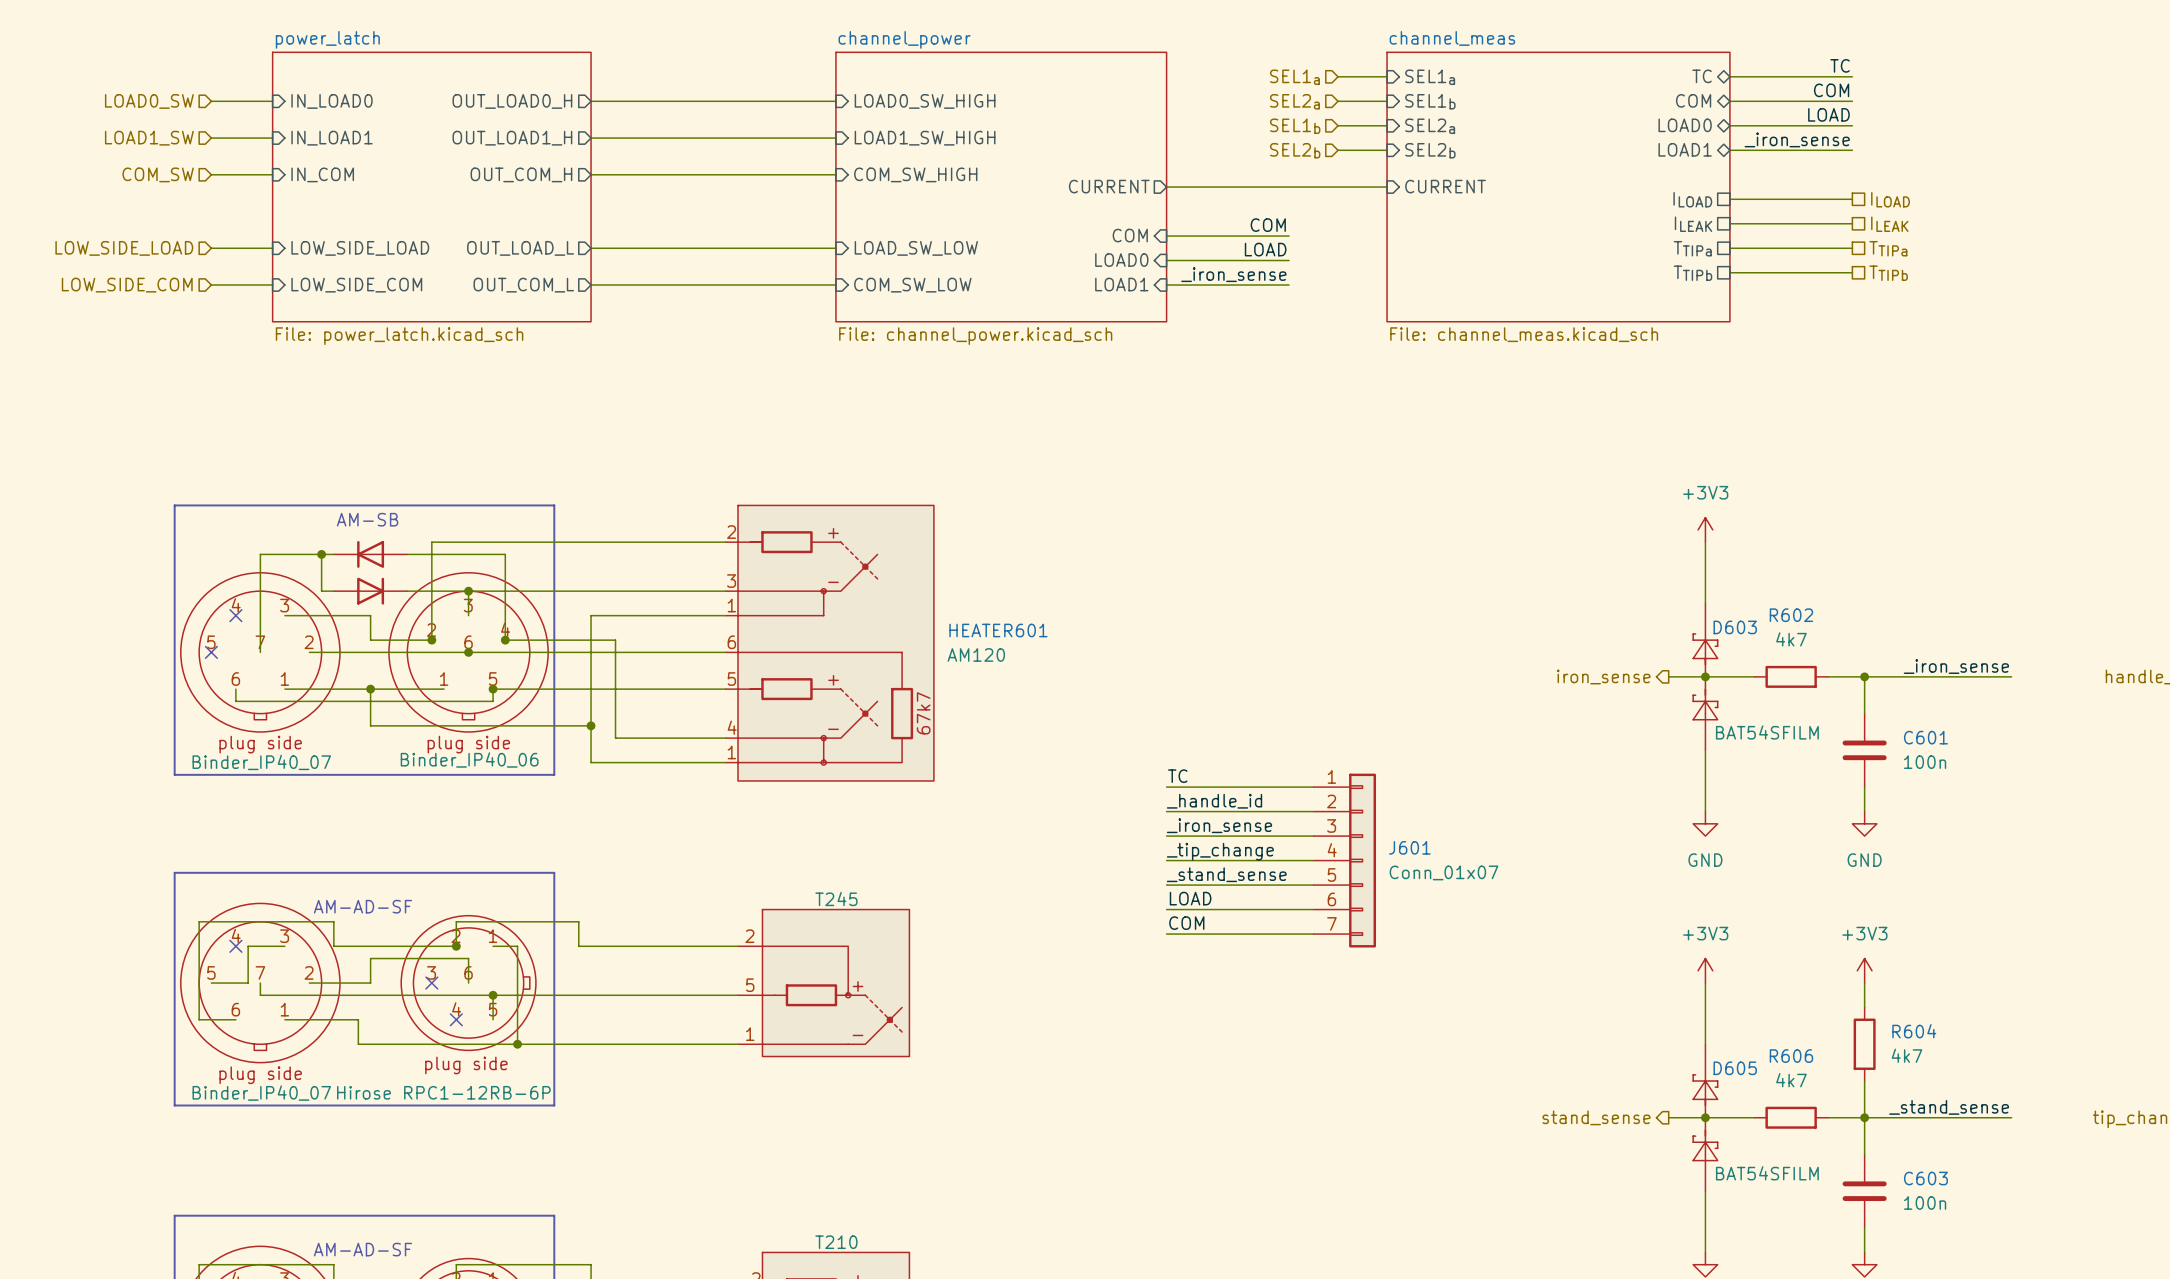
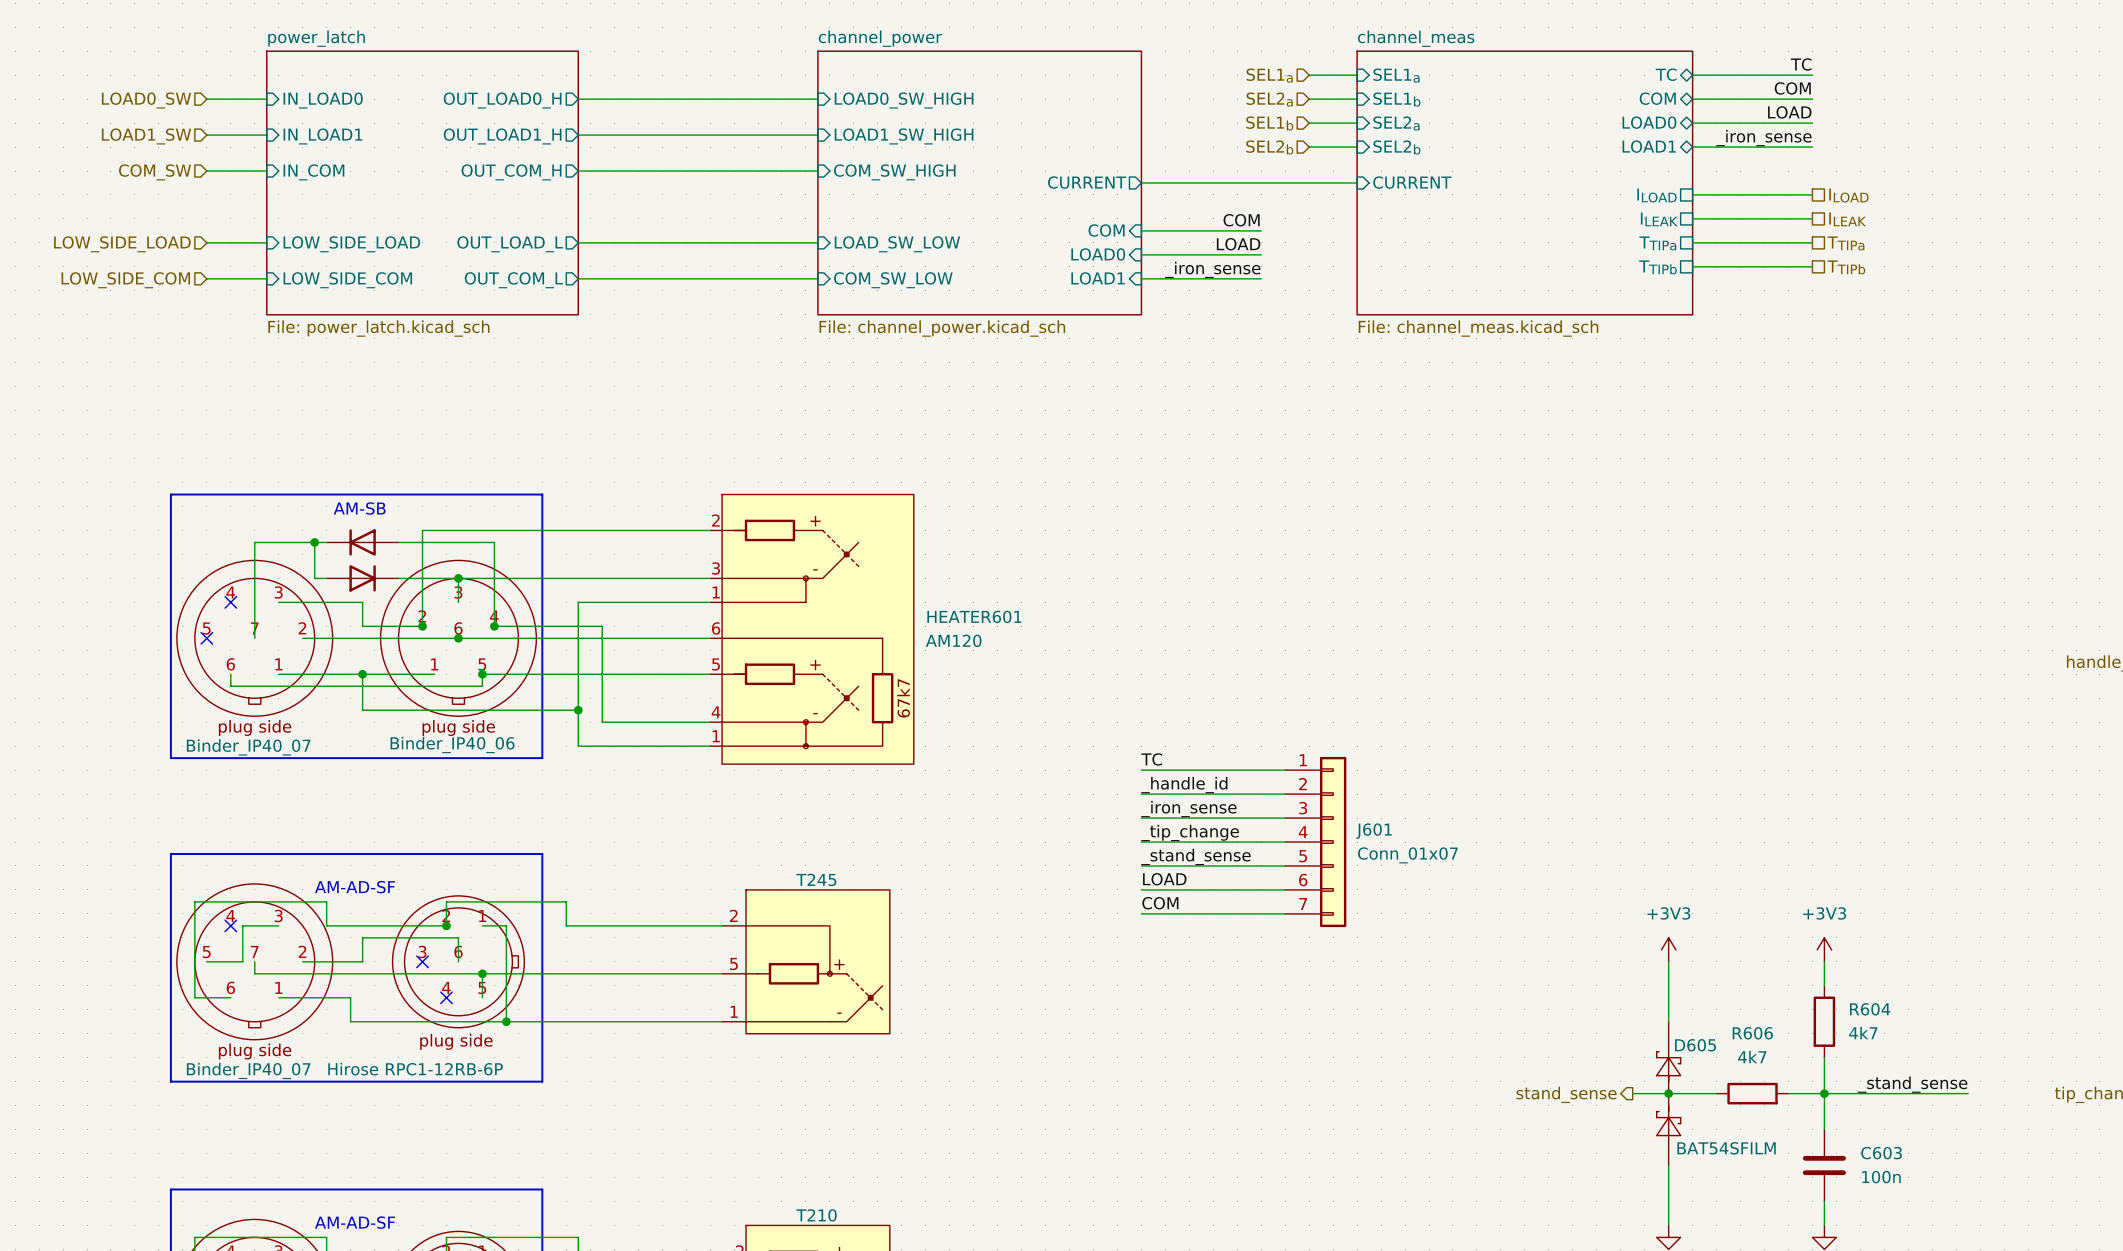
power symbol: +3V3 (1705, 529) -> none
wire: (1705, 542) (1705, 603) -> none
label: _iron_sense (1956, 666) -> none
wire: (1668, 676) (1754, 676) -> none
junction: (1705, 676) -> none
D603: BAT54SFILM (1705, 676) -> none
R602: 4k7 (1791, 676) -> none
wire: (1827, 676) (2011, 676) -> none
wire: (1864, 676) (1864, 713) -> none
junction: (1864, 676) -> none
hierarchical label: iron_sense (1603, 677) -> none
wire: (1705, 750) (1705, 811) -> none
C601: 100n (1864, 750) -> none
wire: (1864, 787) (1864, 811) -> none
power symbol: GND (1705, 823) -> none
power symbol: GND (1864, 823) -> none

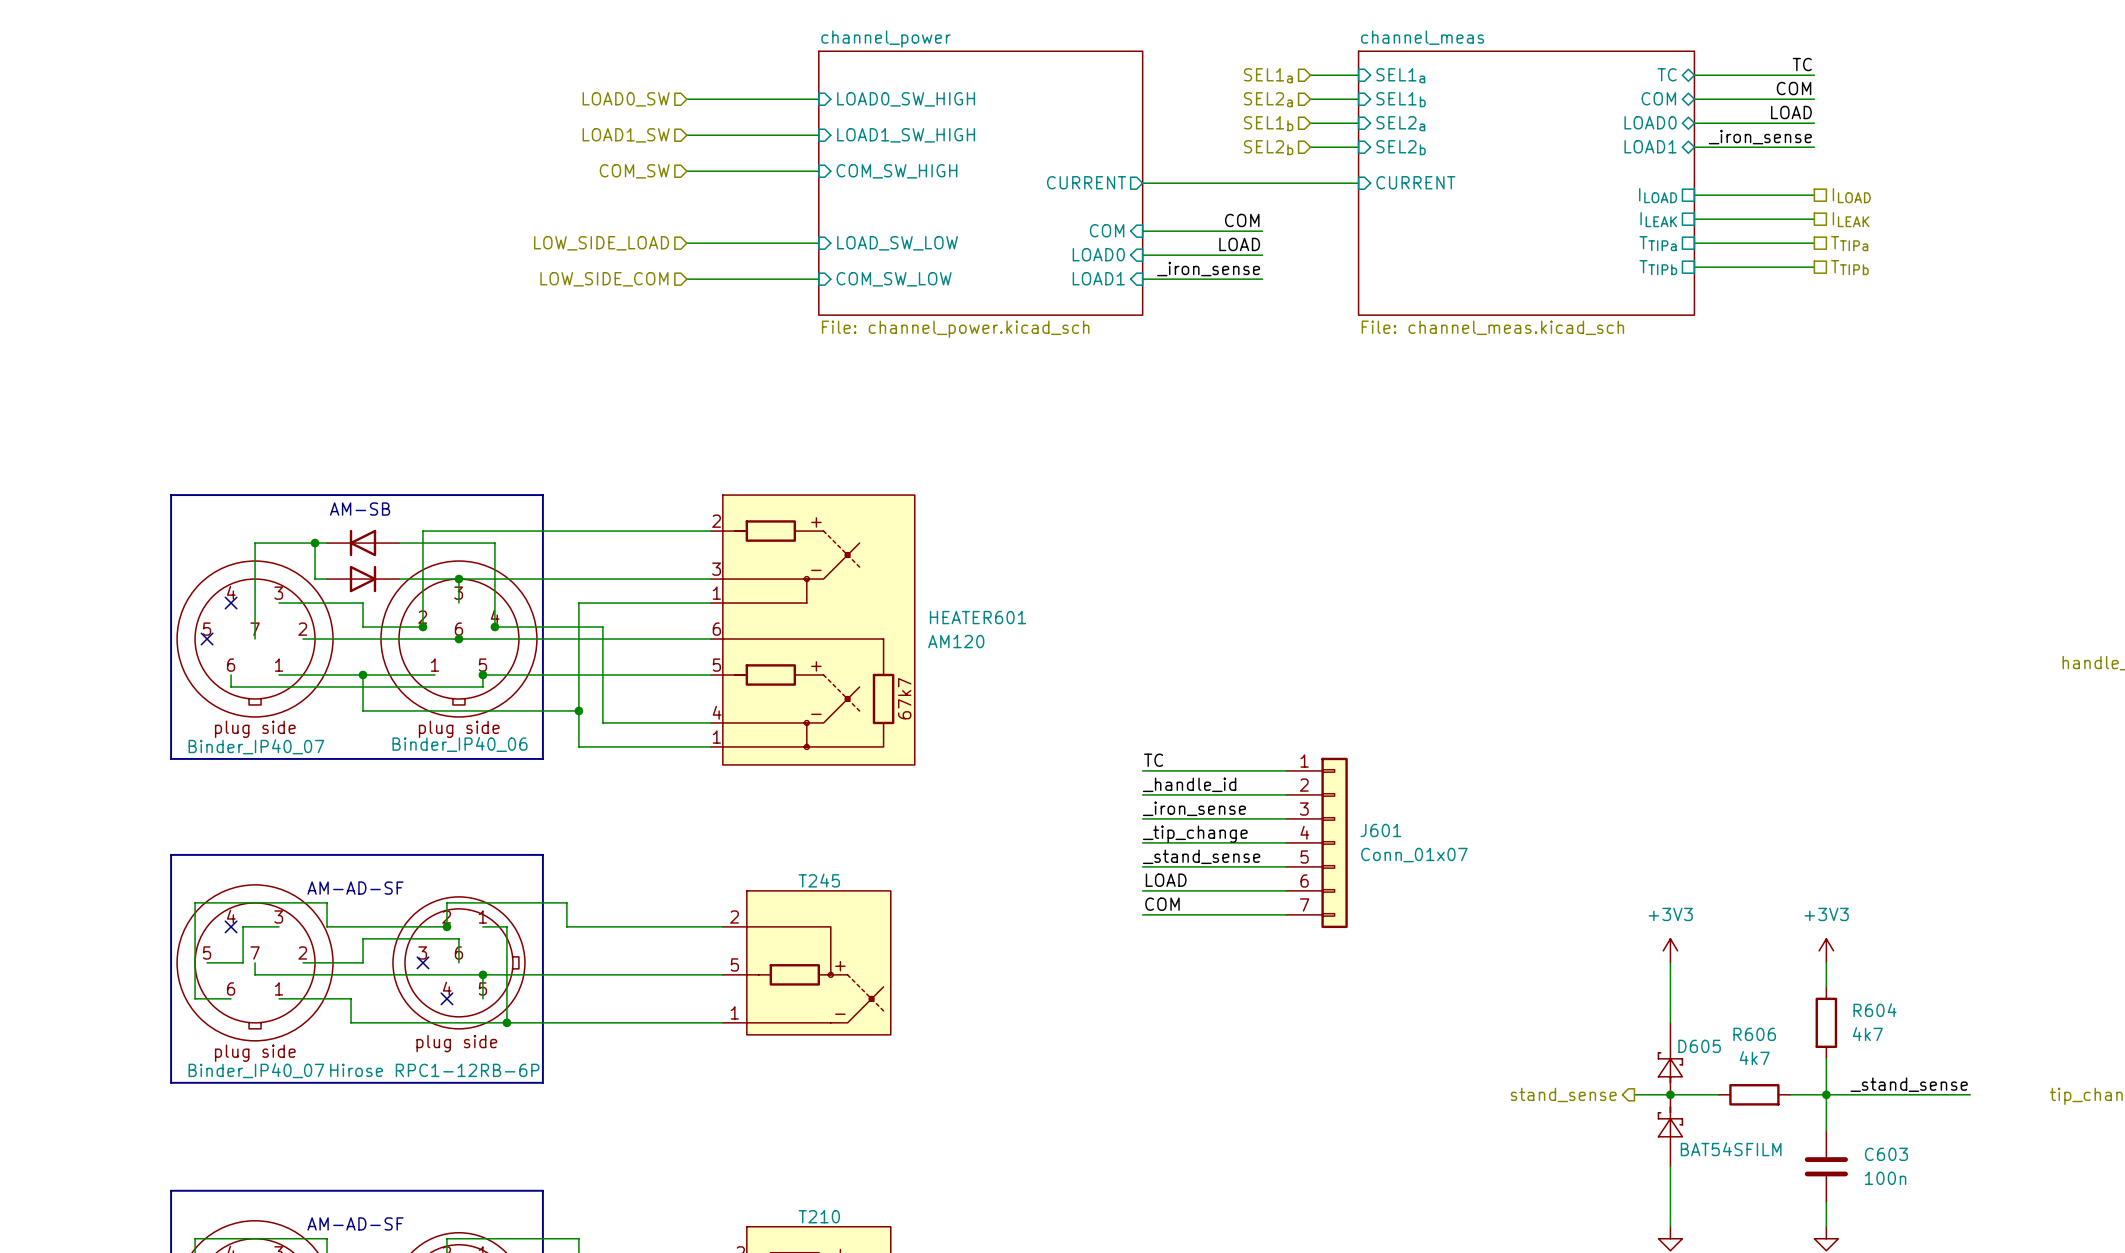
wire: (206, 99) (266, 99) -> none
wire: (578, 99) (686, 99) -> none
hierarchical label: LOAD0_SW (146, 100) -> none
sheet pin: IN_LOAD0 (323, 100) -> none
sheet pin: OUT_LOAD0_H (502, 100) -> none
hierarchical label: none -> LOAD0_SW (626, 99)
wire: (206, 135) (266, 135) -> none
wire: (578, 135) (686, 135) -> none
hierarchical label: LOAD1_SW (146, 136) -> none
sheet pin: IN_LOAD1 (322, 136) -> none
sheet pin: OUT_LOAD1_H (502, 136) -> none
hierarchical label: none -> LOAD1_SW (626, 135)
wire: (206, 171) (266, 171) -> none
wire: (578, 171) (686, 171) -> none
hierarchical label: COM_SW (155, 172) -> none
sheet pin: IN_COM (313, 172) -> none
sheet pin: OUT_COM_H (511, 172) -> none
hierarchical label: none -> COM_SW (634, 171)
sheet power_latch: File: power_latch.kicad_sch (422, 183) -> none
wire: (206, 242) (266, 242) -> none
wire: (578, 242) (686, 242) -> none
hierarchical label: LOW_SIDE_LOAD (122, 244) -> none
sheet pin: LOW_SIDE_LOAD (351, 244) -> none
sheet pin: OUT_LOAD_L (510, 244) -> none
hierarchical label: none -> LOW_SIDE_LOAD (601, 243)
wire: (206, 278) (266, 278) -> none
wire: (578, 278) (686, 278) -> none
hierarchical label: LOW_SIDE_COM (125, 280) -> none
sheet pin: LOW_SIDE_COM (347, 280) -> none
sheet pin: OUT_COM_L (513, 280) -> none
hierarchical label: none -> LOW_SIDE_COM (604, 279)

